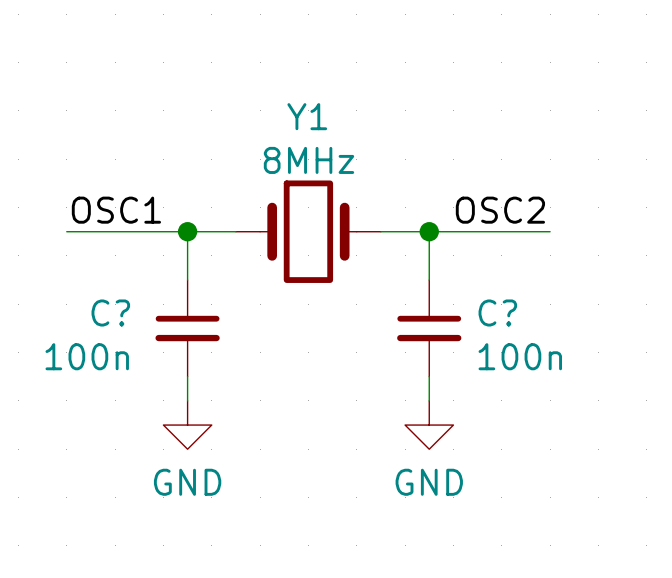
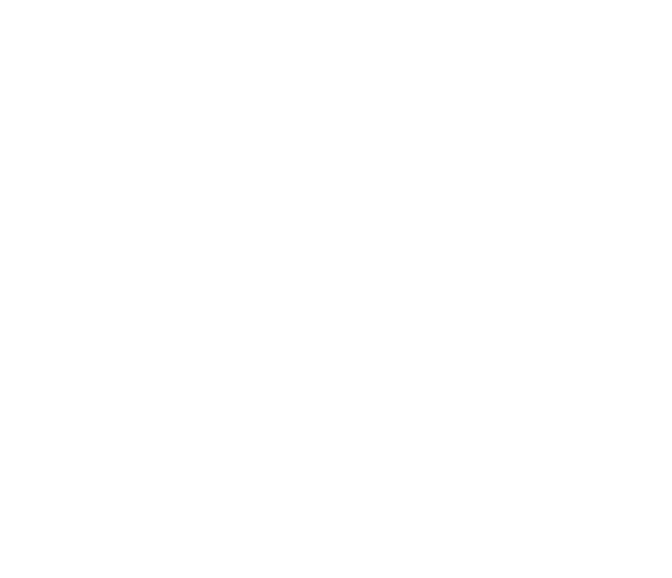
label: OSC1 (116, 210) -> none
label: OSC2 (500, 210) -> none
wire: (66, 231) (235, 231) -> none
wire: (187, 231) (187, 280) -> none
junction: (187, 231) -> none
Y1: 8MHz (308, 231) -> none
wire: (380, 231) (550, 231) -> none
wire: (429, 231) (429, 280) -> none
junction: (429, 231) -> none
C?: 100n (187, 328) -> none
C?: 100n (429, 328) -> none
wire: (187, 376) (187, 400) -> none
wire: (429, 376) (429, 400) -> none
power symbol: GND (187, 425) -> none
power symbol: GND (429, 425) -> none

